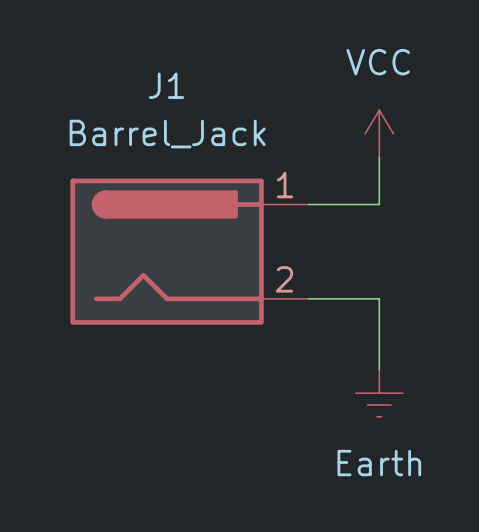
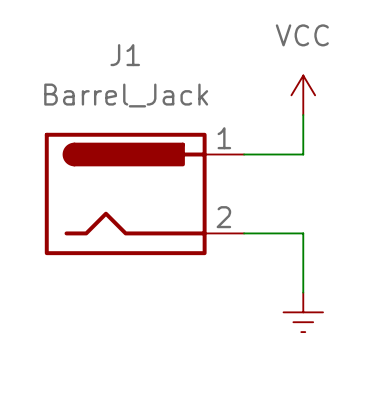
power symbol text: Earth (379, 463) -> none

